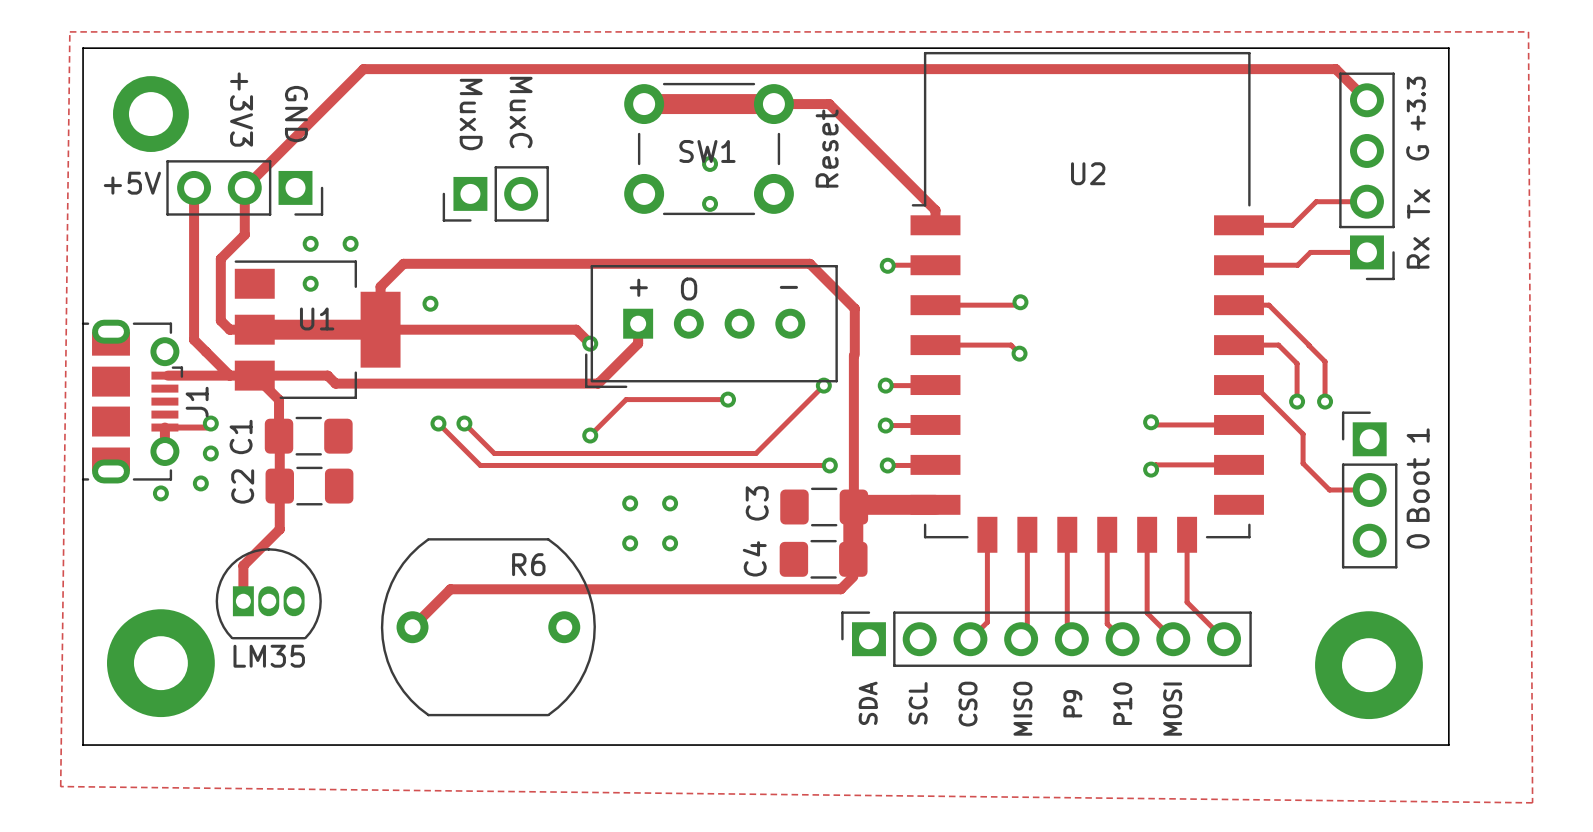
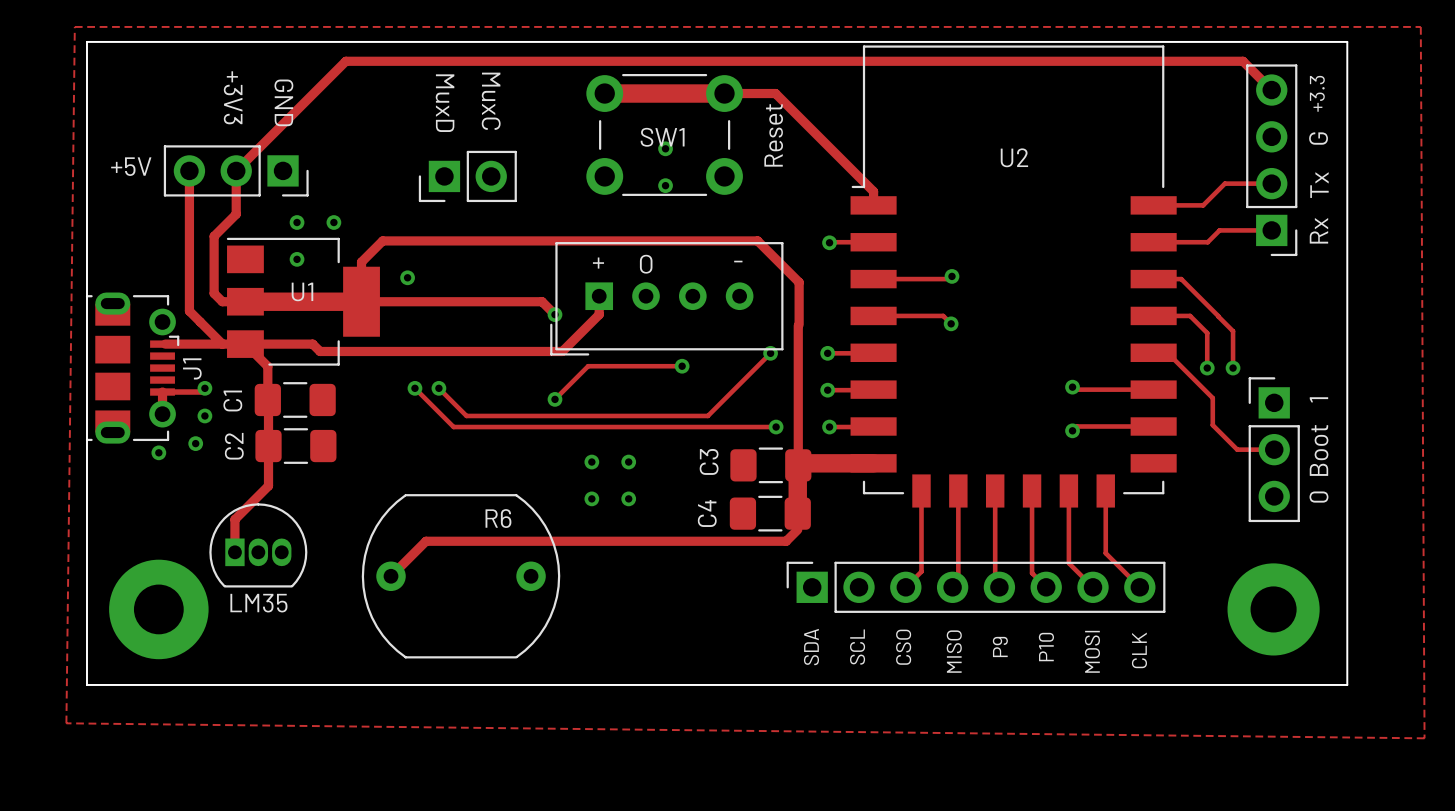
part: (150, 114) -> none
part footprint: [1315, 611, 1423, 720] -> [1227, 563, 1320, 656]
text: none -> CLK (1139, 650)

